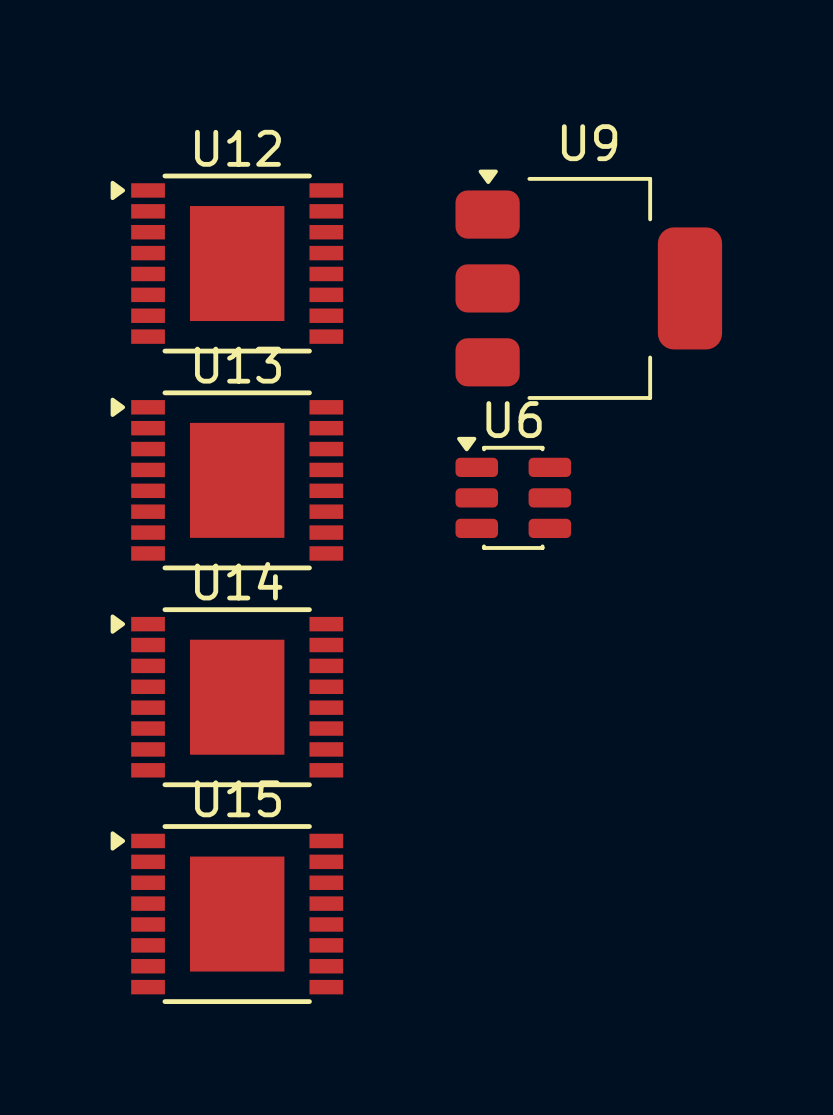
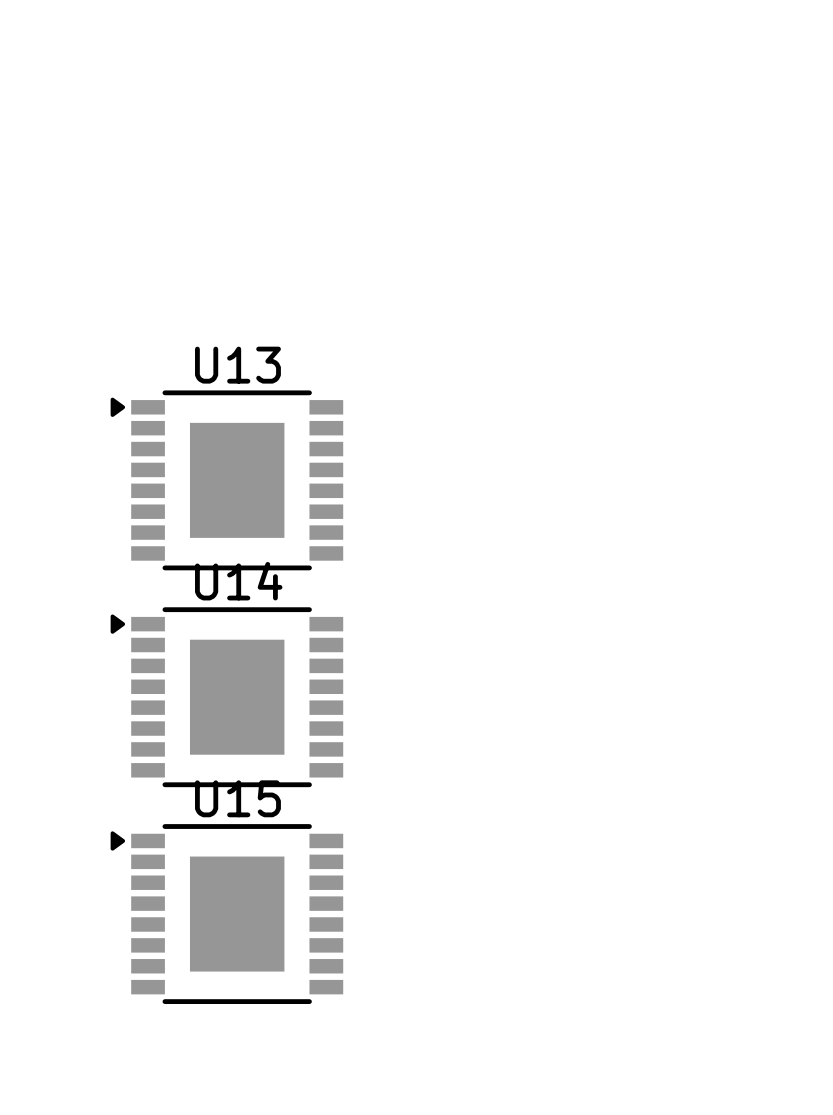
U12: (226, 263) -> none
U9: (588, 284) -> none
U6: (513, 493) -> none

